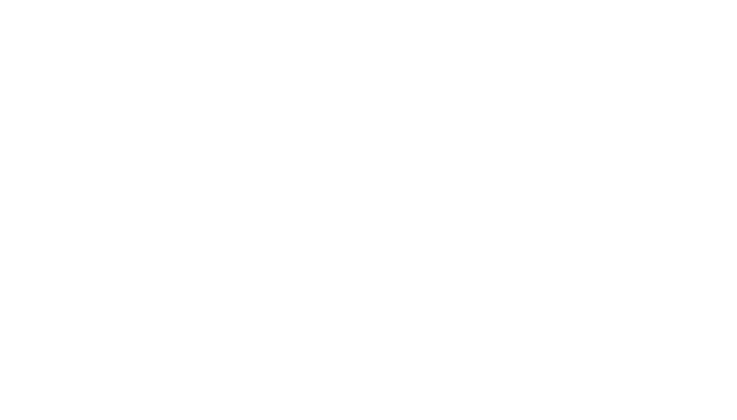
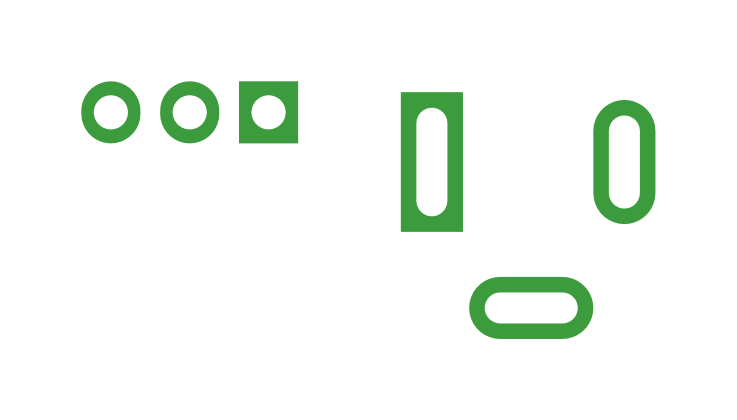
part: none -> (189, 112)
part: none -> (528, 215)

